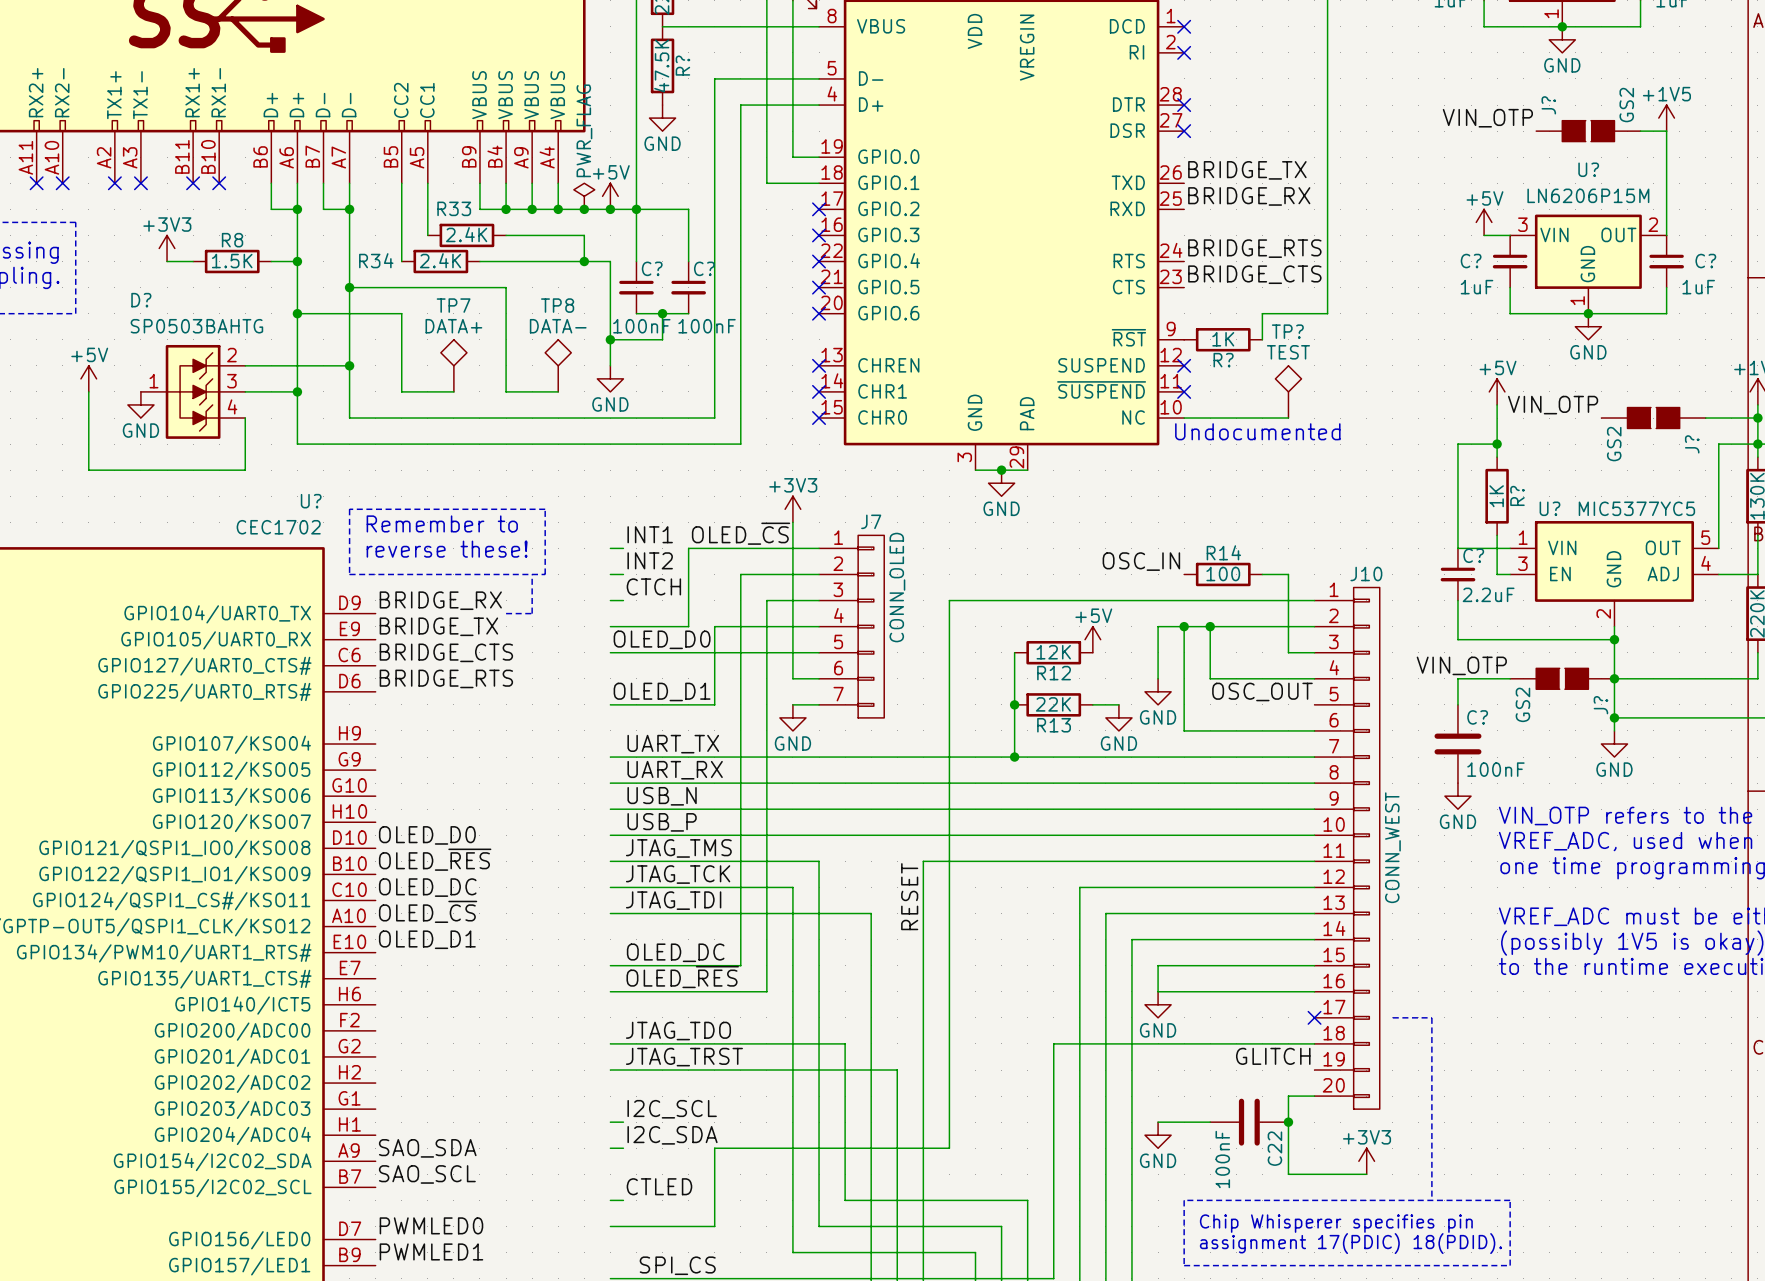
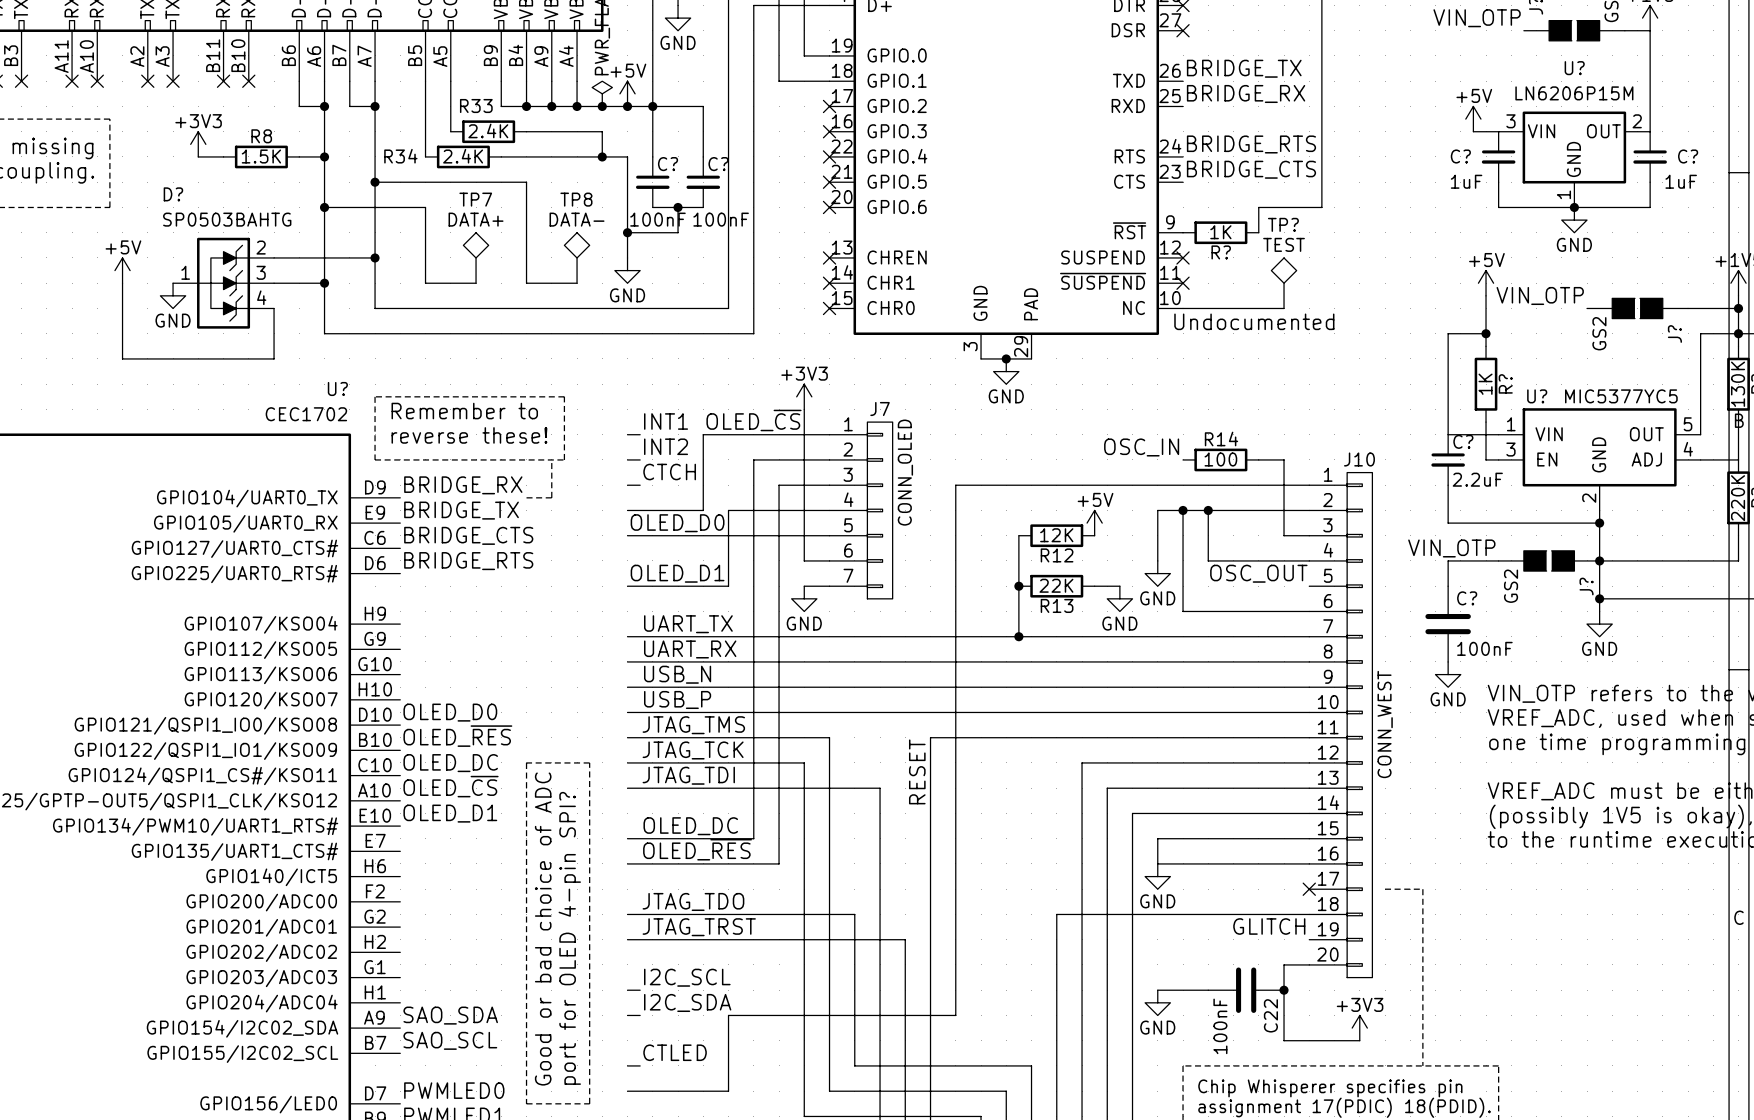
line: none -> (526, 762) (589, 762) (589, 1103) (526, 1103) (526, 762)
text: none -> Good or bad choice of ADC (543, 929)
text: none -> port for OLED 4-pin SPI? (569, 938)

